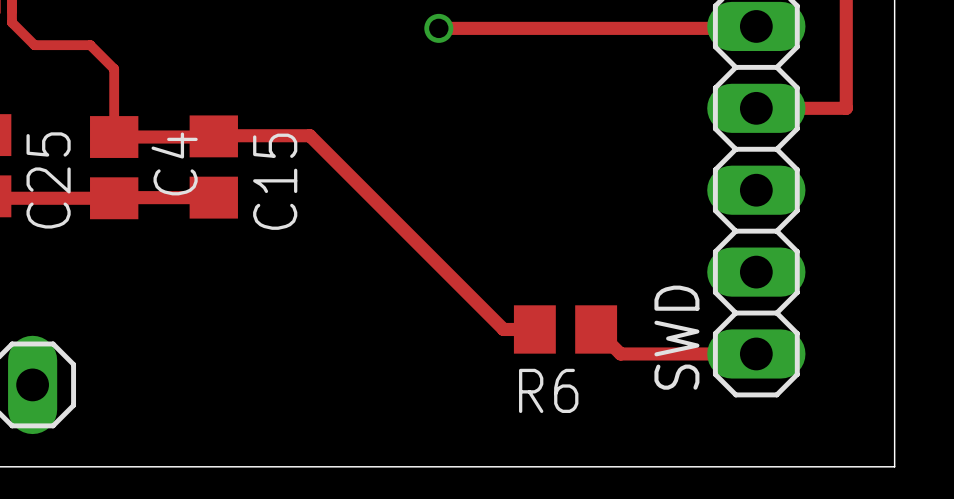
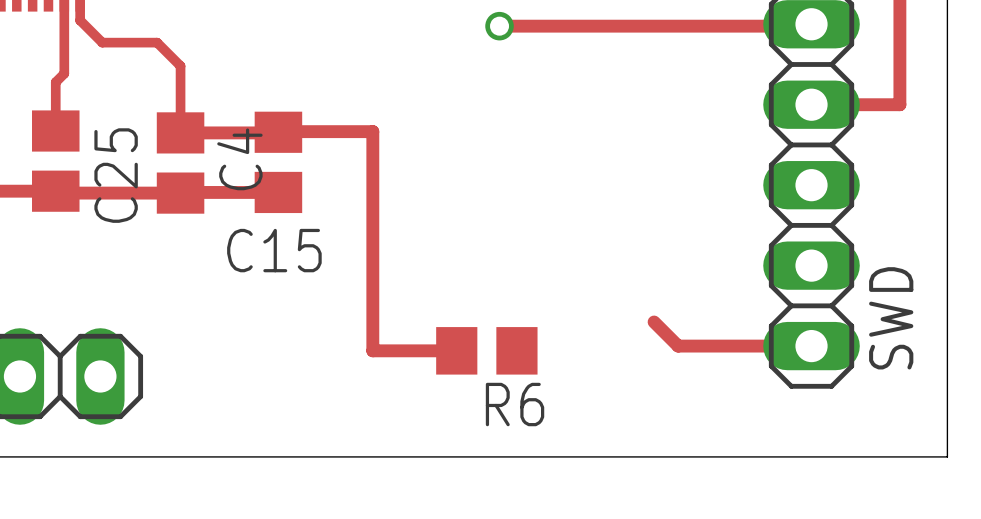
track: (309, 135) (503, 329) (534, 329) -> (372, 131) (372, 350) (456, 350)
C15 name rotation: 0° (275, 181) -> 90° clockwise (274, 250)
R6 position: (565, 329) -> (486, 350)
SWD name position: SWD (676, 337) -> SWD (891, 318)
R6 name position: R6 (548, 390) -> R6 (515, 404)

